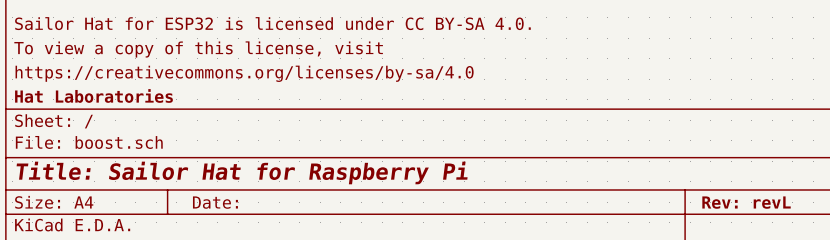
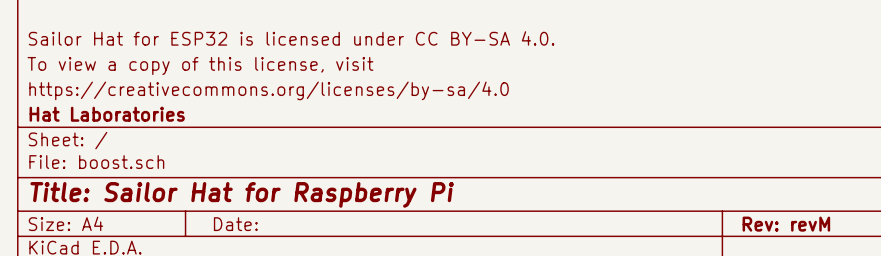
title block: Rev: revL (746, 202) -> Rev: revM (786, 224)

